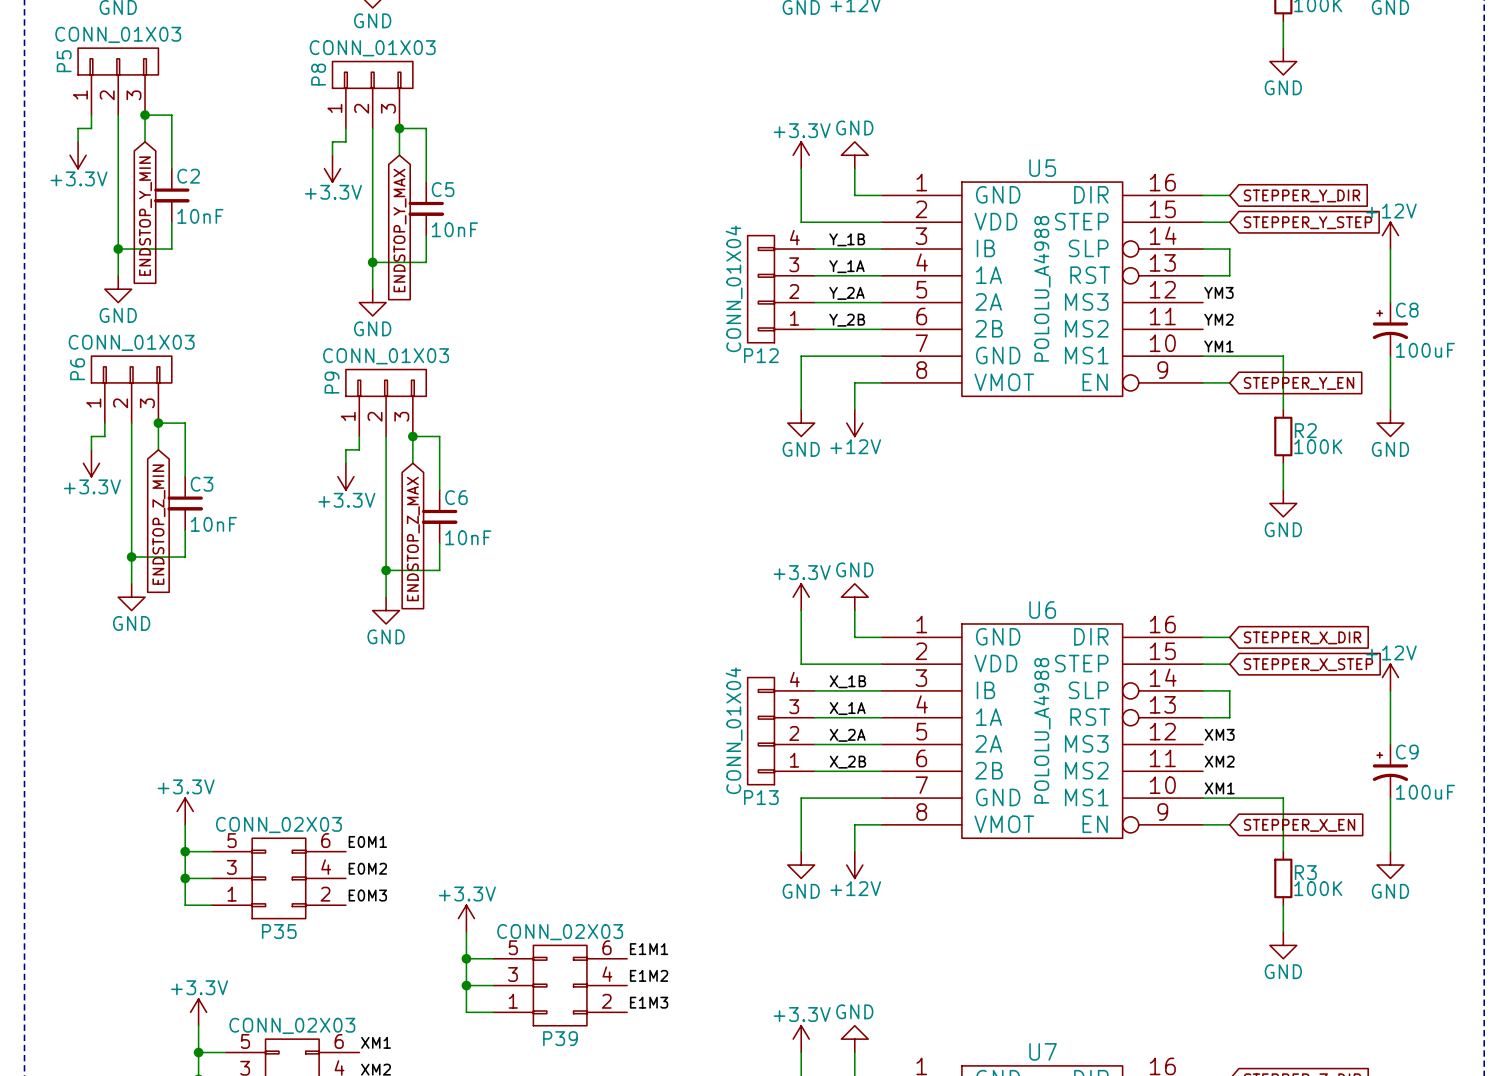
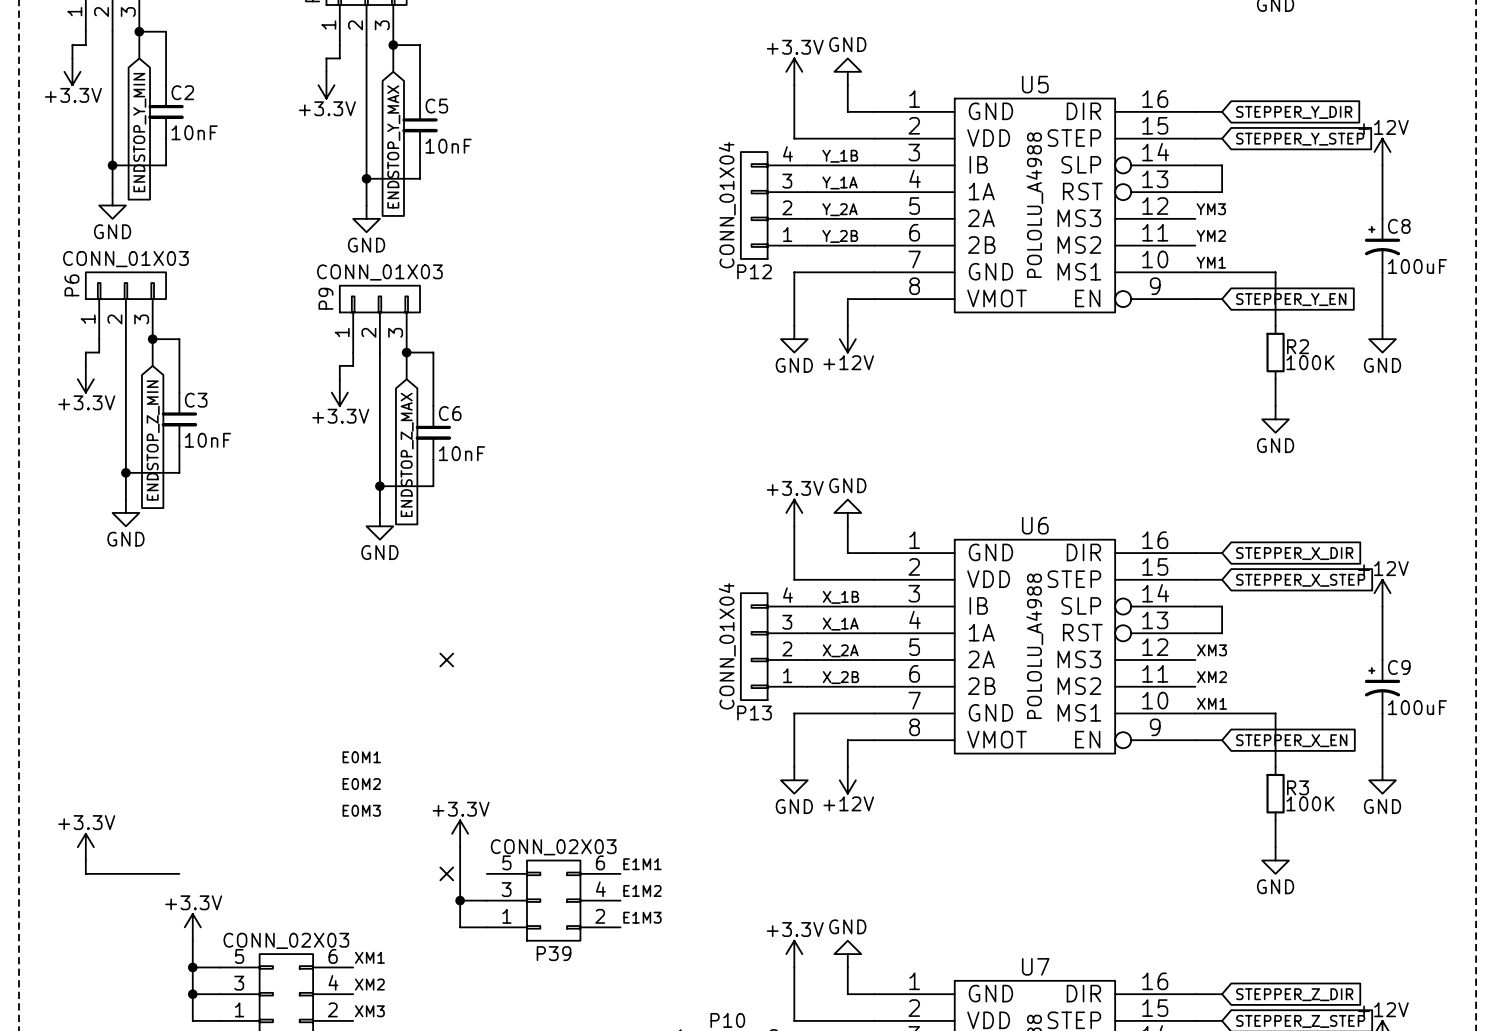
no-connect mark: none -> (446, 660)
power symbol: +3.3V (185, 811) -> none
wire: (185, 824) (185, 905) (211, 905) -> none
wire: (185, 851) (211, 851) -> none
junction: (185, 851) -> none
wire: (185, 878) (211, 878) -> none
junction: (185, 878) -> none
P35: CONN_02X03 (278, 878) -> none
power symbol: none -> +3.3V (85, 847)
wire: none -> (85, 860) (85, 873) (179, 873)
no-connect mark: none -> (446, 873)
wire: (466, 958) (493, 958) -> none
junction: (466, 958) -> none

